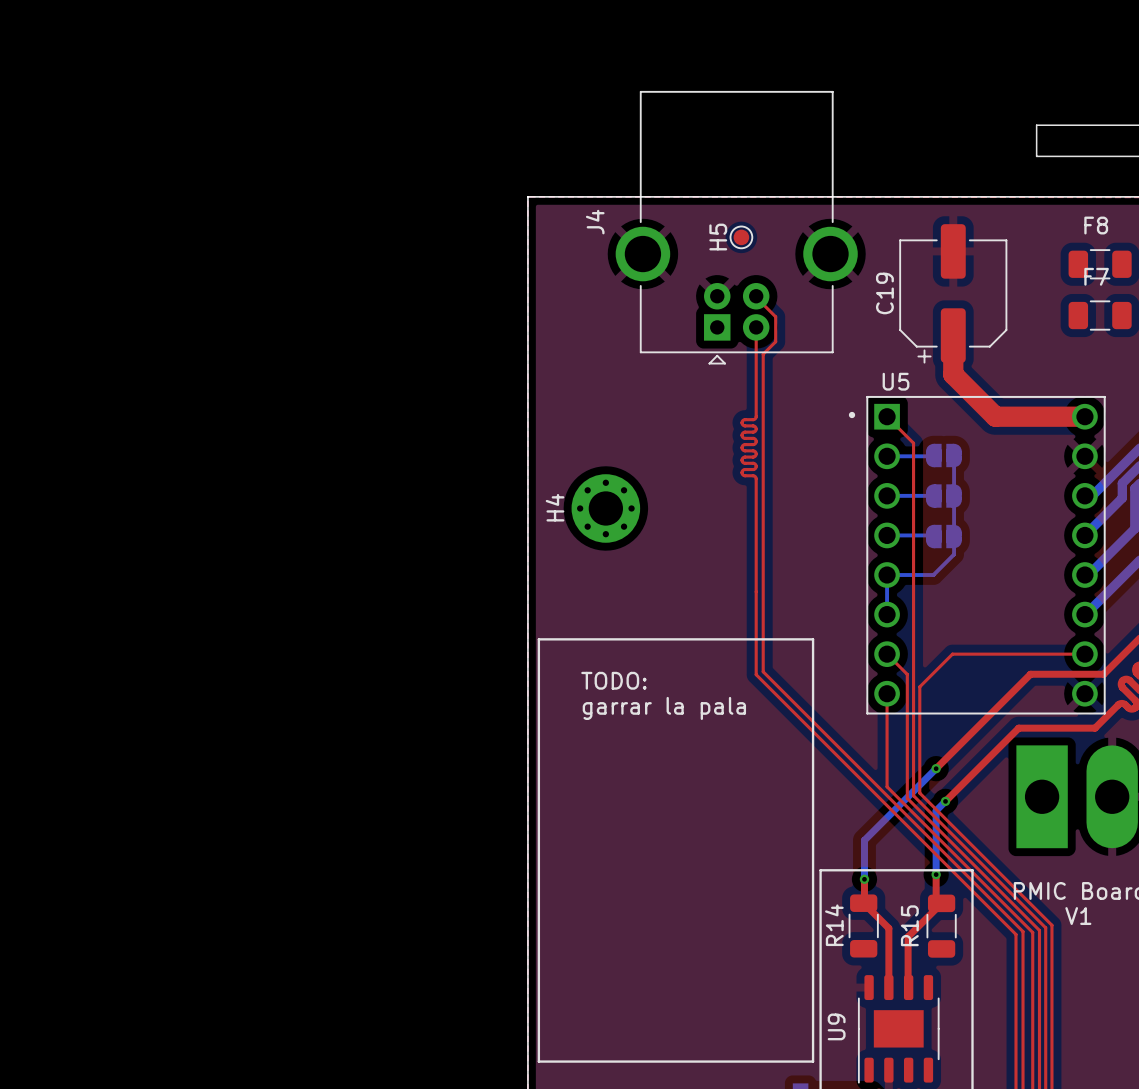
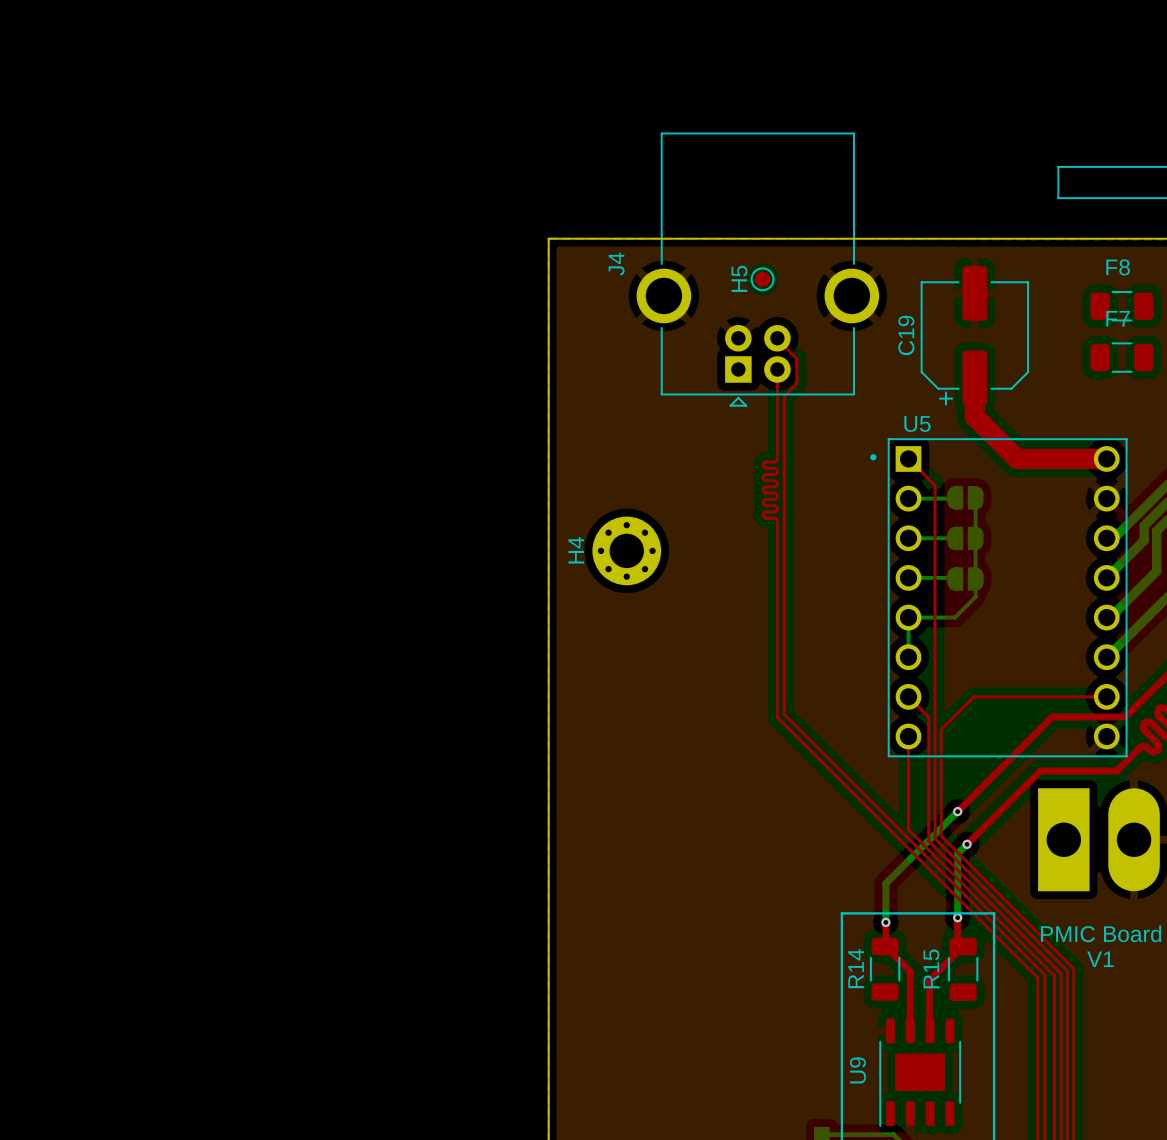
line: (538, 639) (813, 639) (813, 1061) (538, 1061) (538, 639) -> none
text: TODO: (613, 680) -> none
text: garrar la pala (664, 708) -> none

